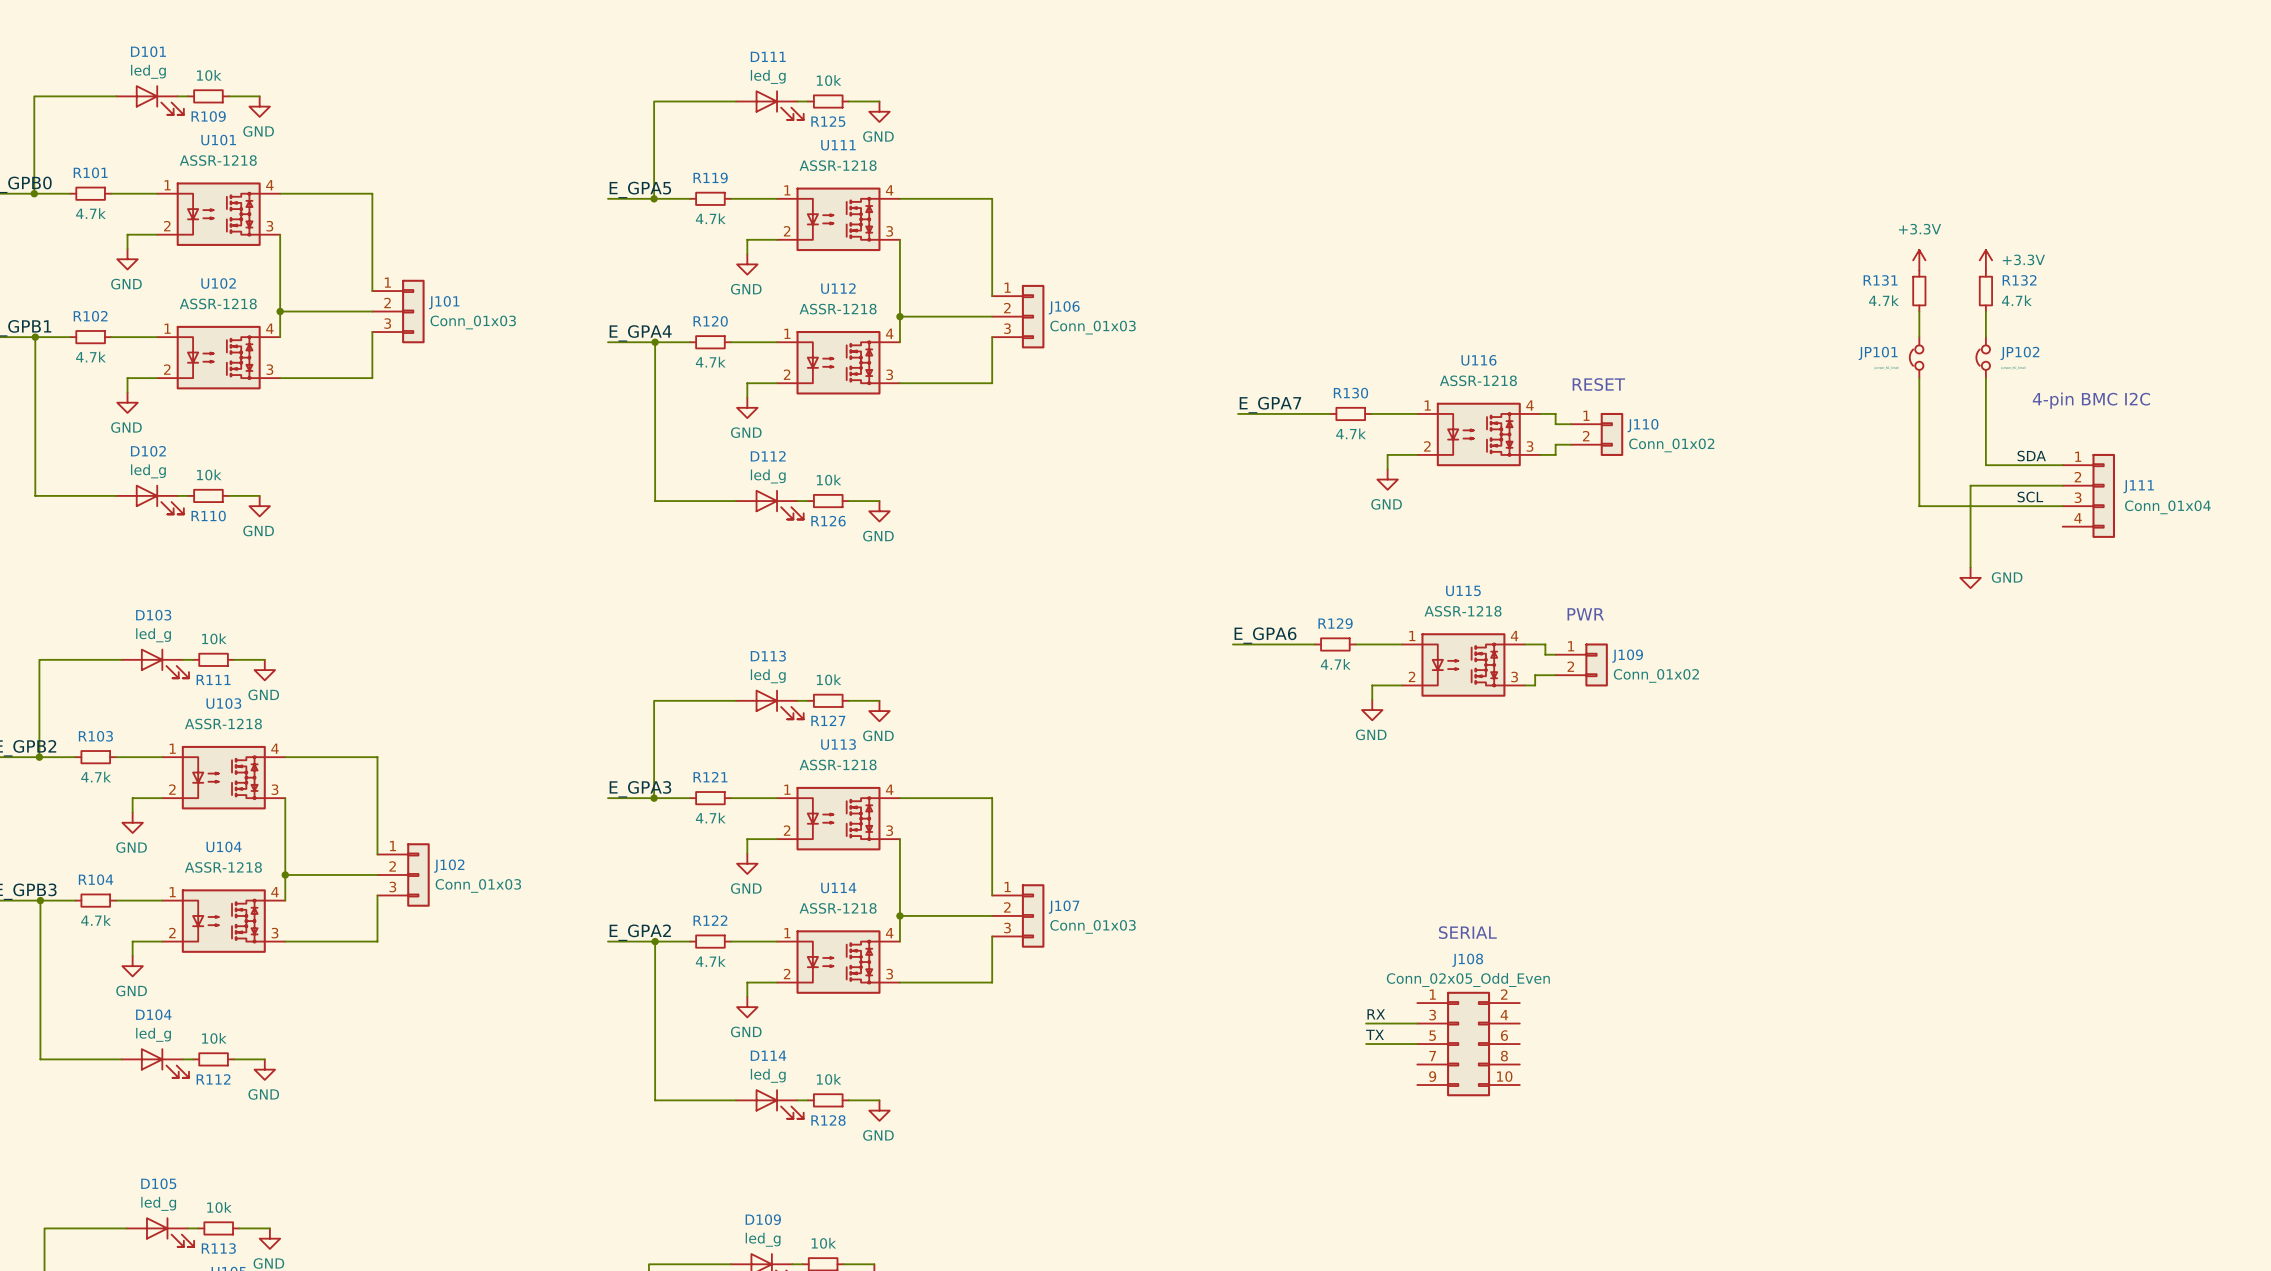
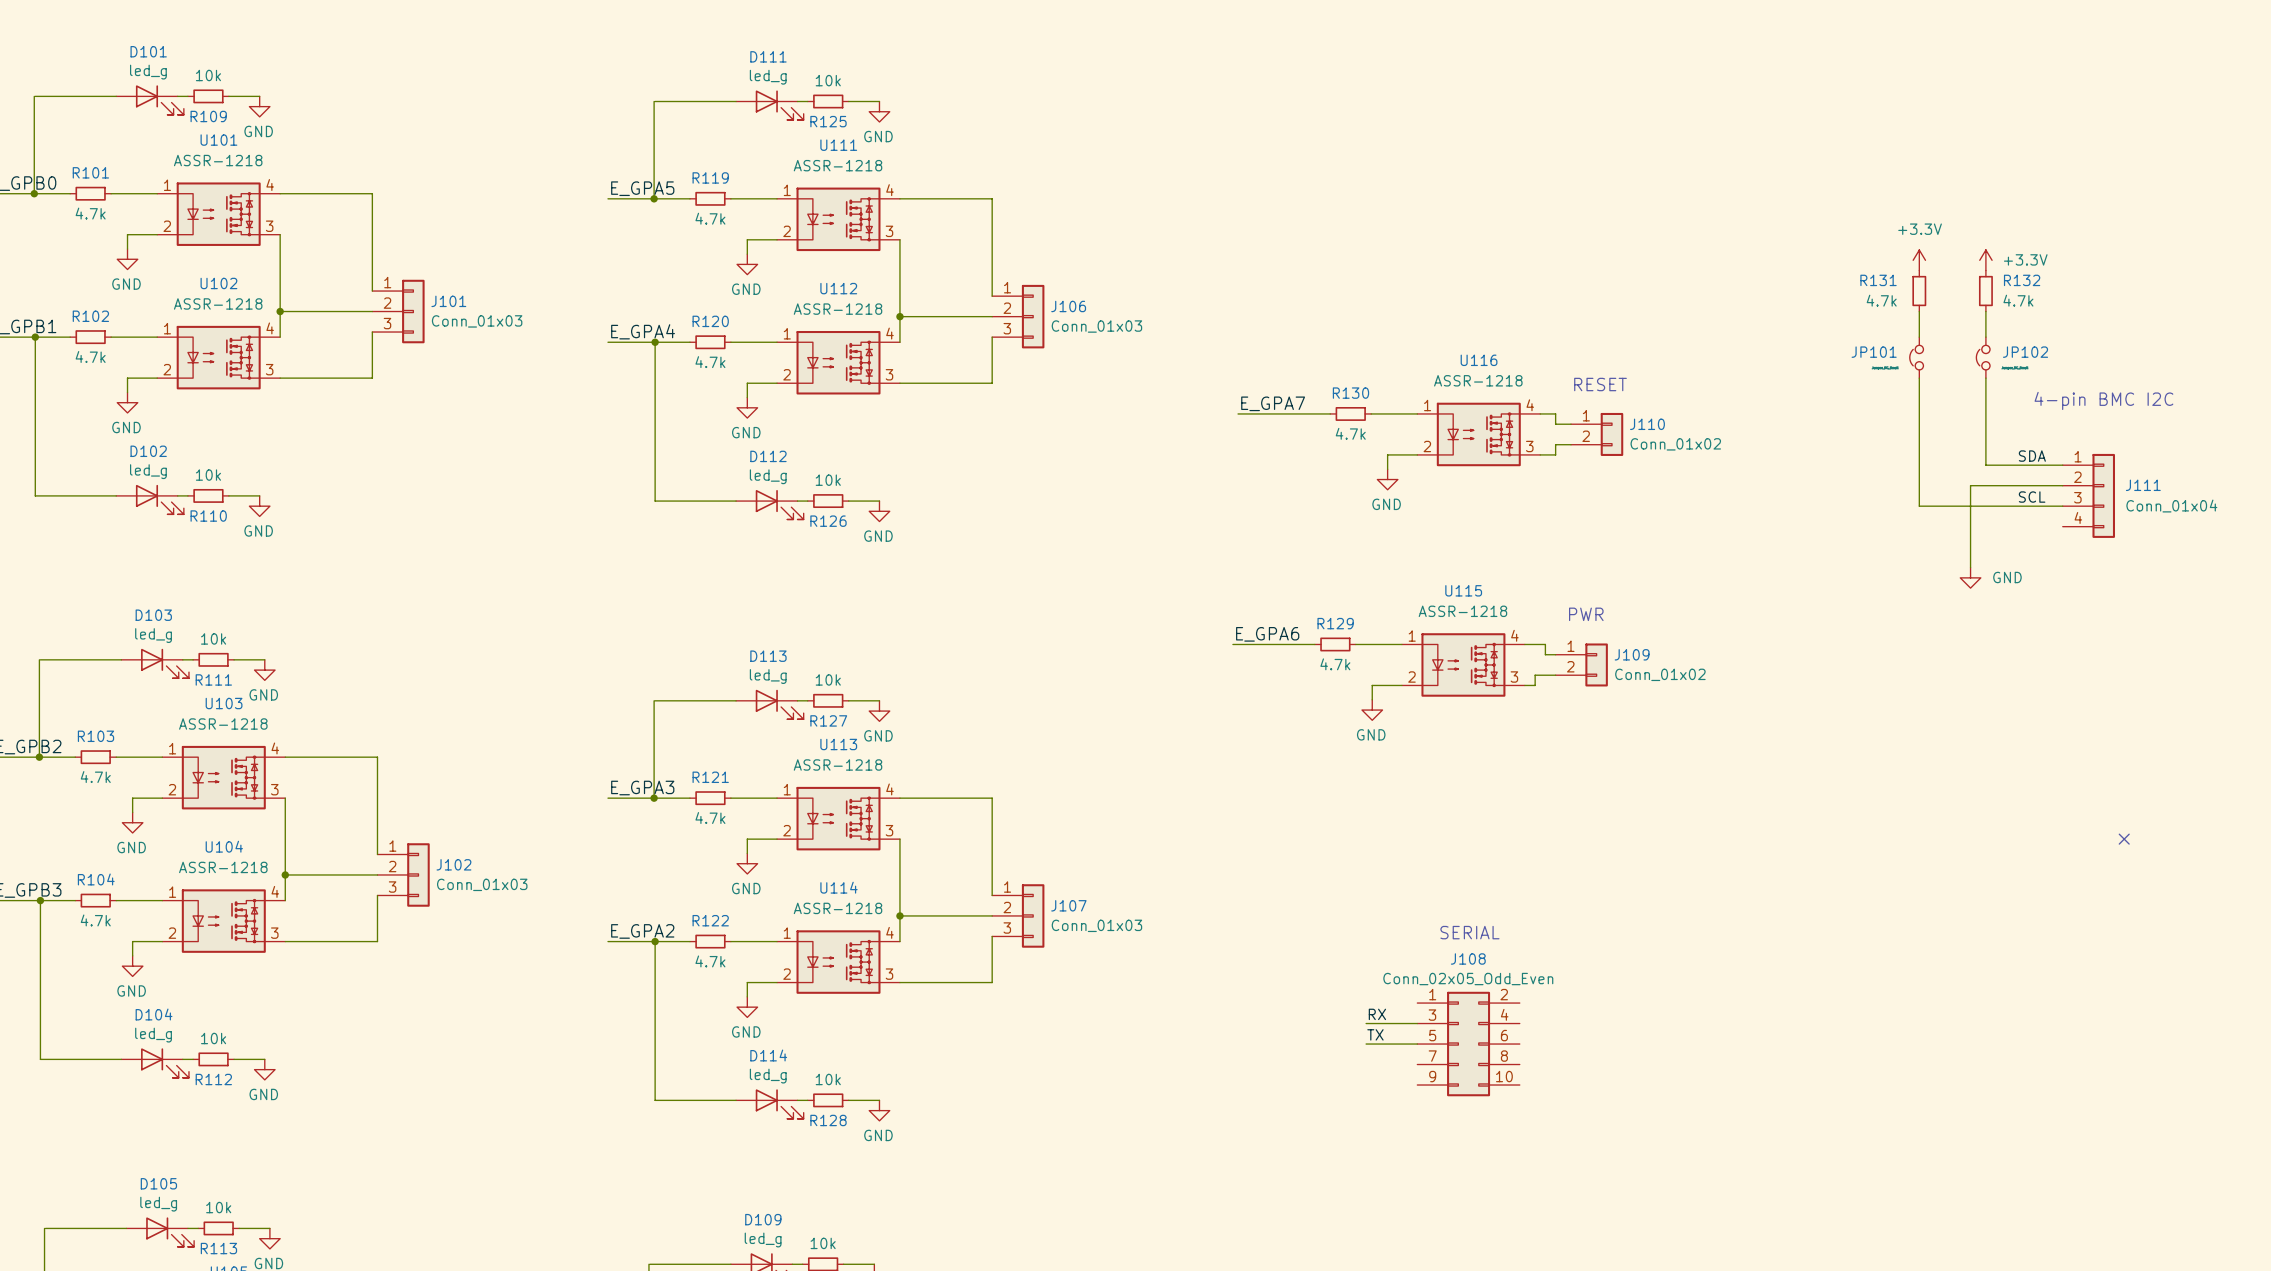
no-connect mark: none -> (2124, 839)

